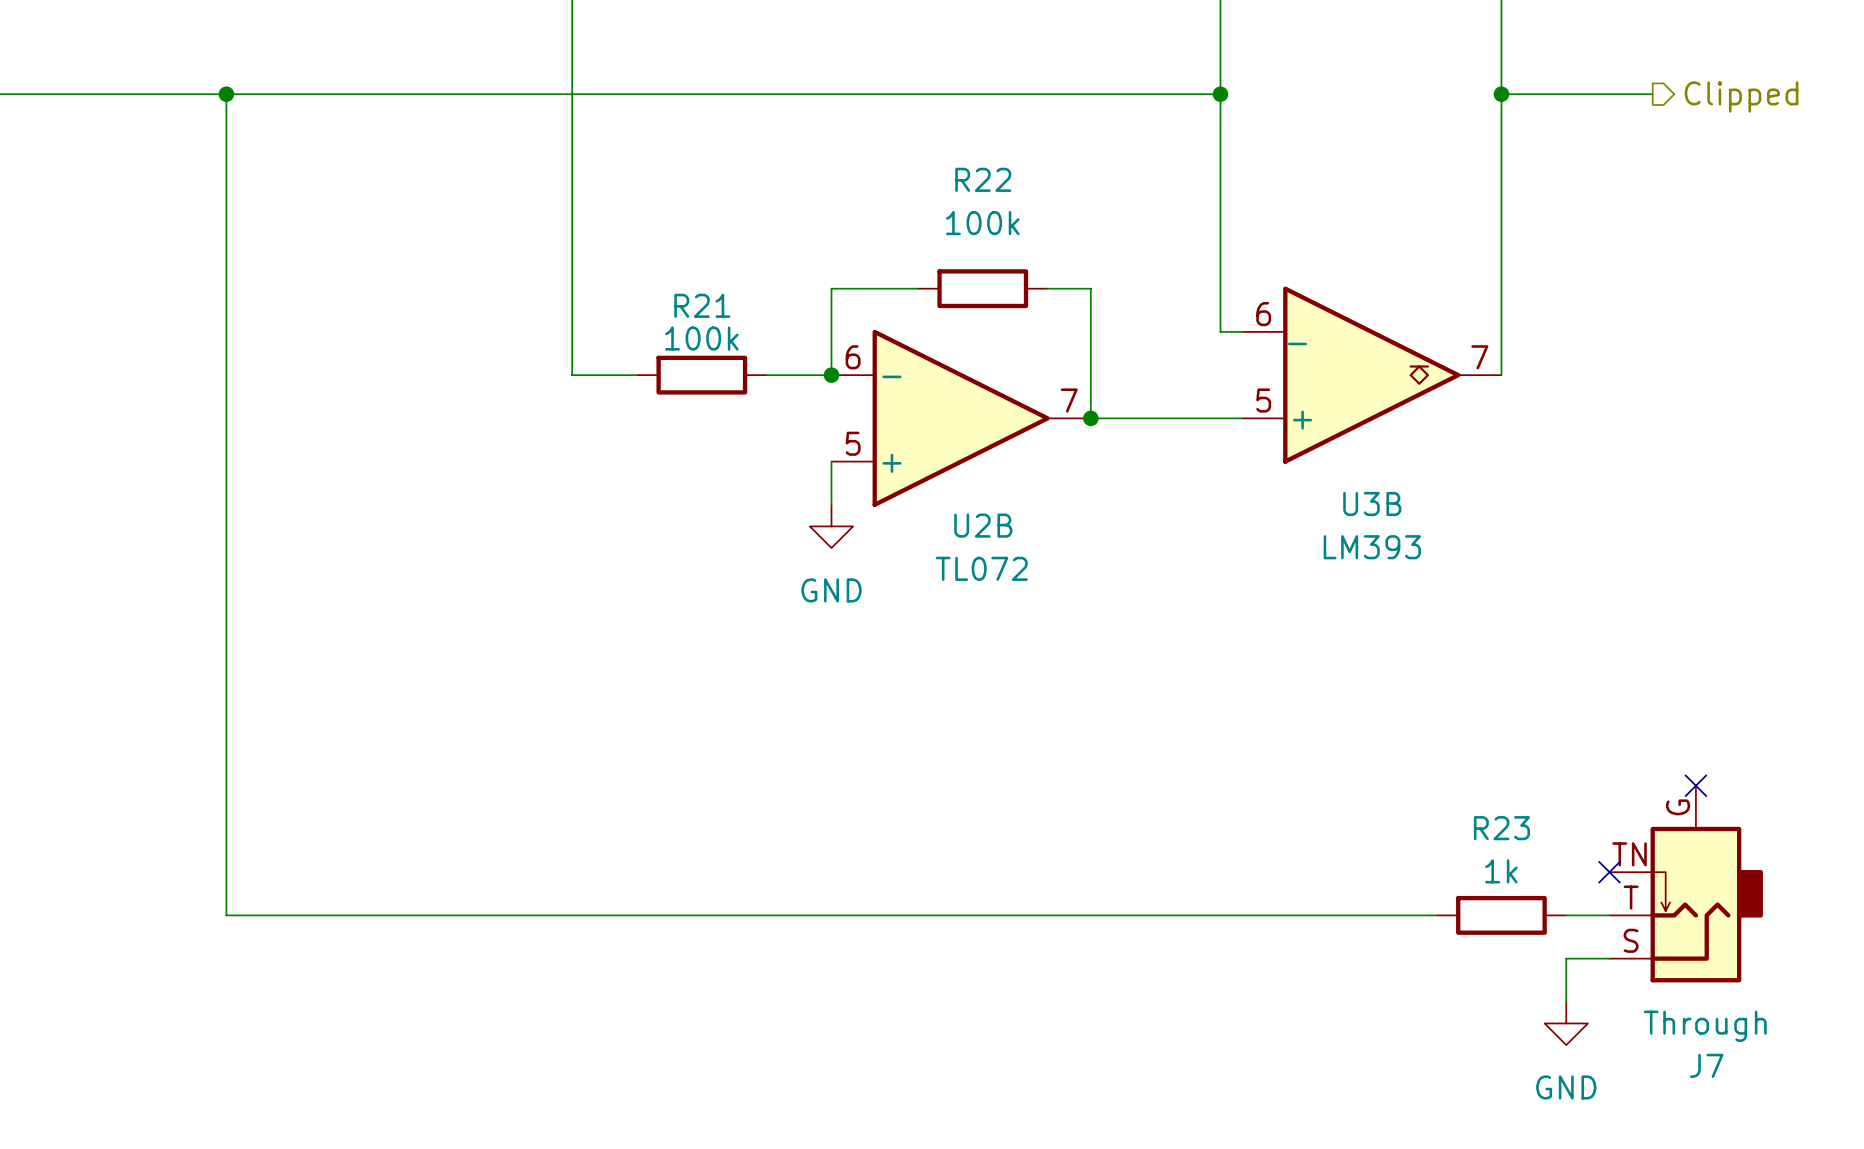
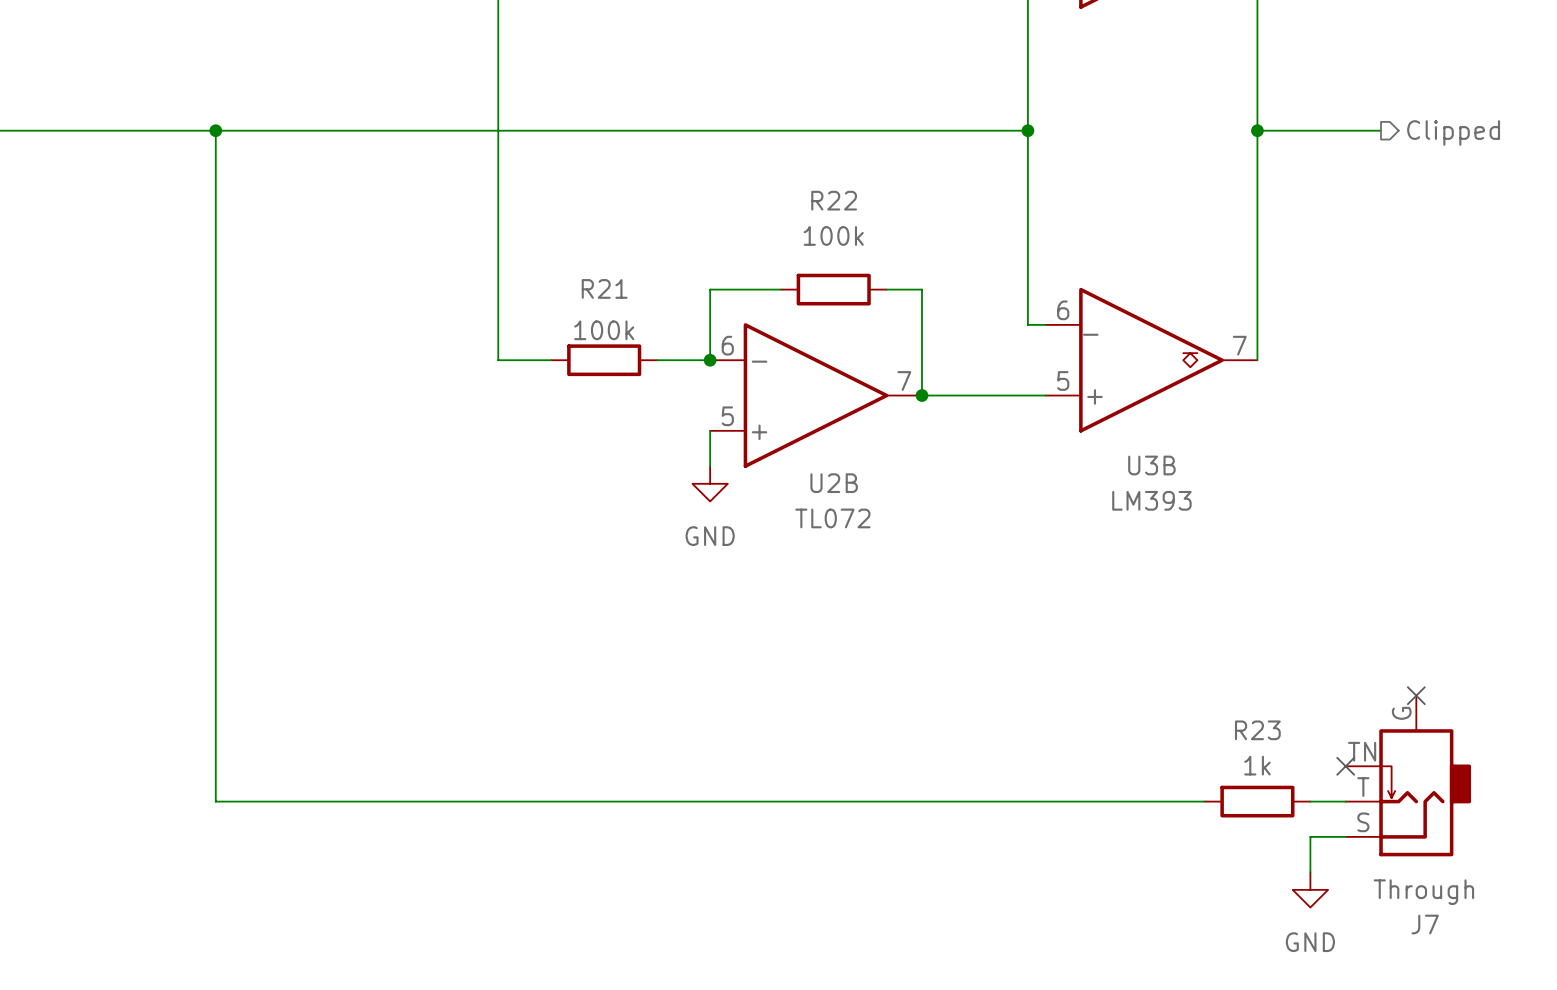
R21 name position: R21 (702, 305) -> R21 (604, 288)

